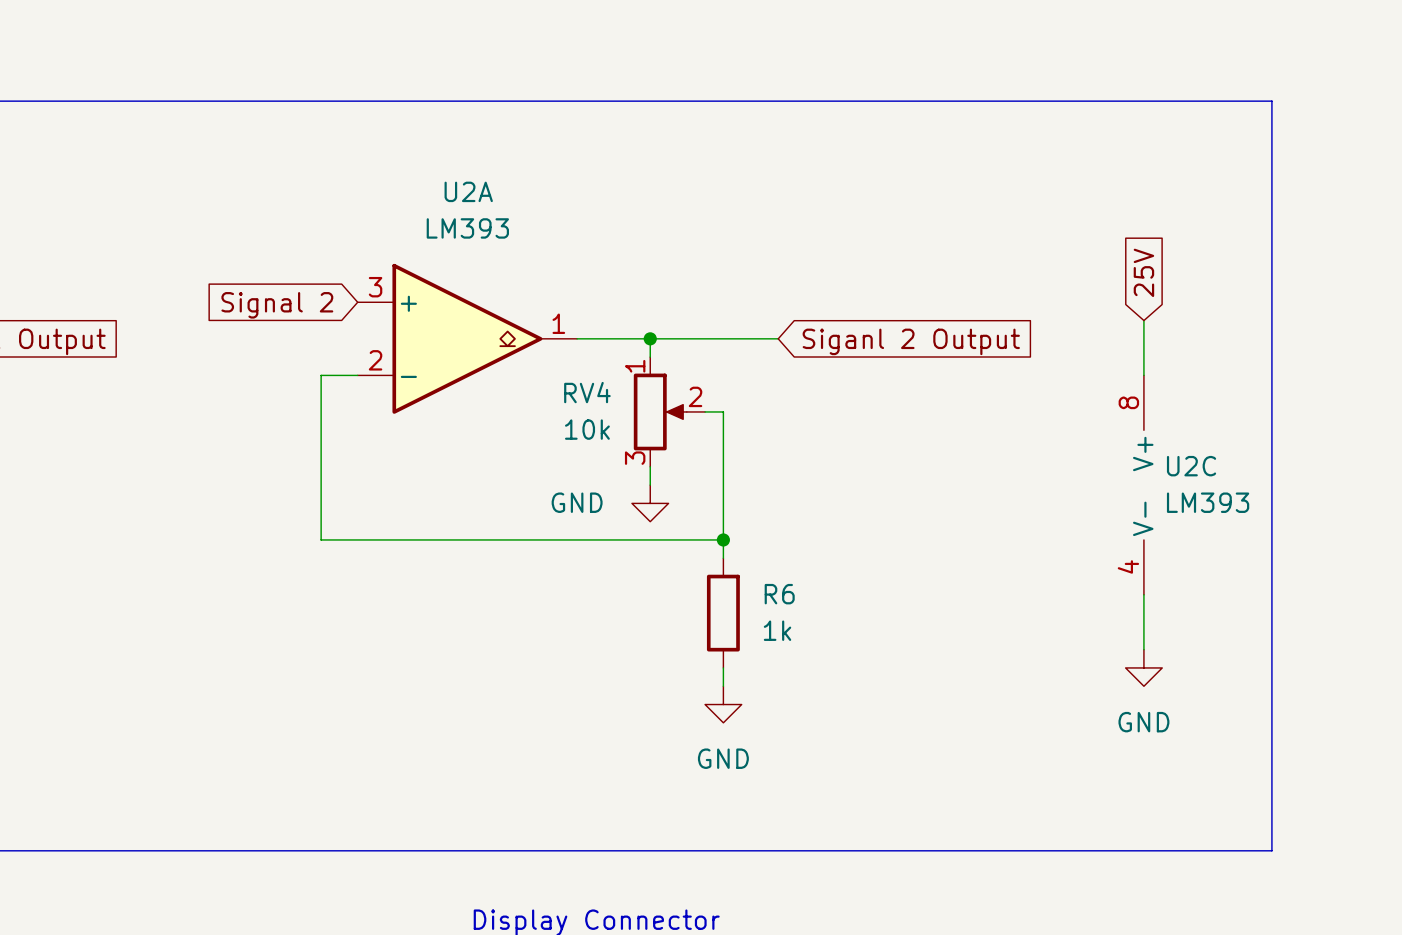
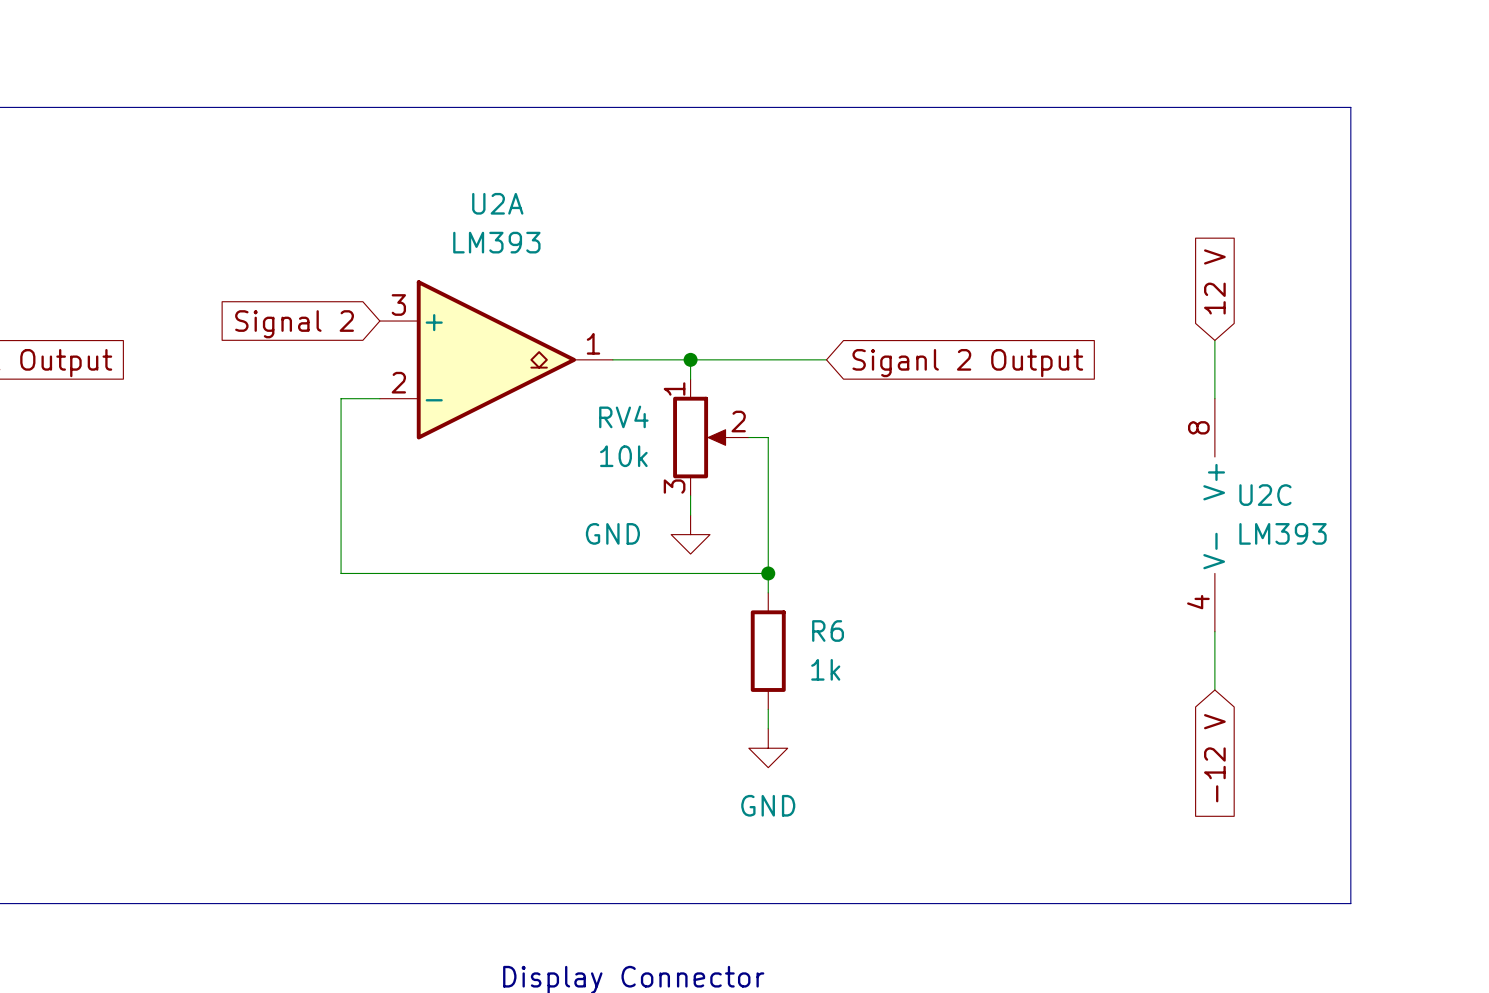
global label: 25V (1143, 272) -> 12 V (1214, 281)
power symbol: GND (1143, 667) -> none
global label: none -> -12 V (1214, 758)

